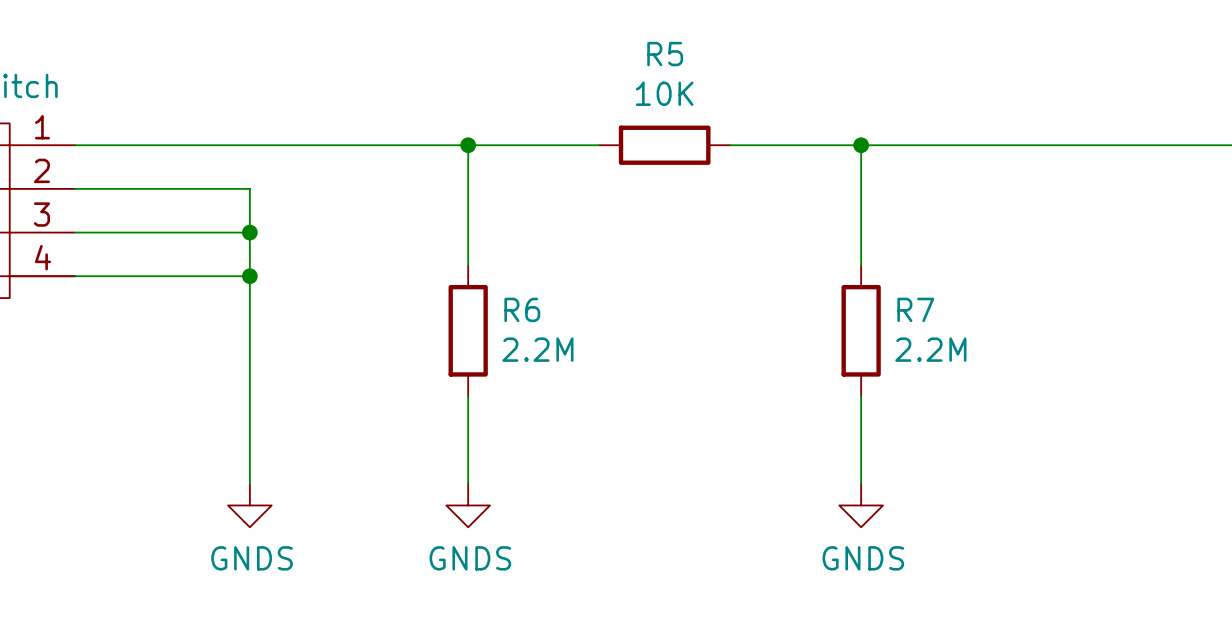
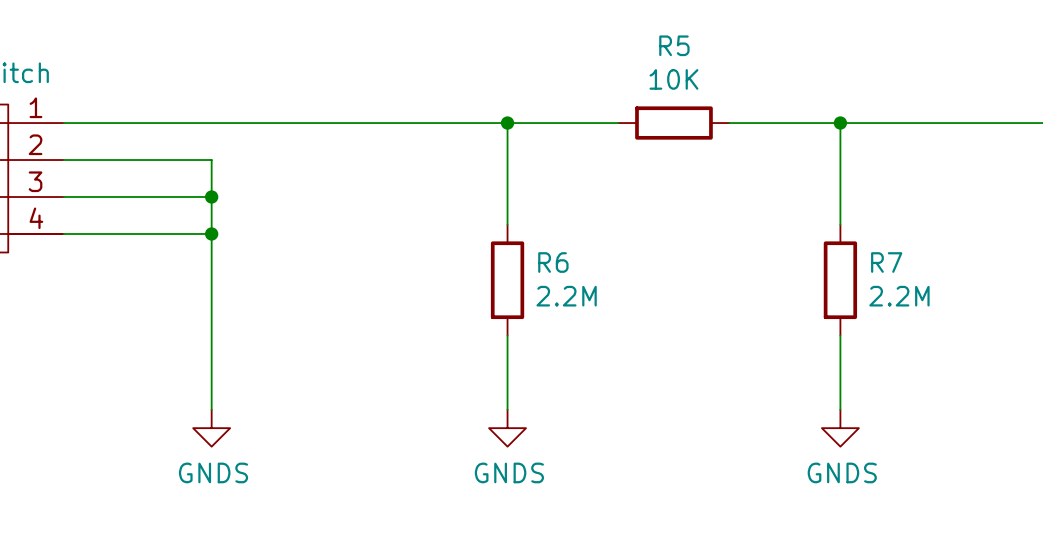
wire: (468, 145) (468, 265) -> none
junction: (468, 145) -> none
junction: none -> (507, 123)
R5 position: (664, 145) -> (673, 123)
wire: (730, 145) (861, 145) (861, 265) -> (618, 123) (507, 123) (507, 224)
junction: (861, 145) -> none
wire: none -> (840, 123) (840, 224)
junction: none -> (840, 123)
R6 position: (468, 330) -> (507, 280)
R7 position: (861, 330) -> (840, 280)
wire: (468, 396) (468, 483) -> (507, 335) (507, 409)
wire: (861, 396) (861, 483) -> (840, 335) (840, 409)
power symbol: GNDS (468, 505) -> none
power symbol: none -> GNDS (507, 428)
power symbol: GNDS (861, 505) -> none
power symbol: none -> GNDS (840, 428)

